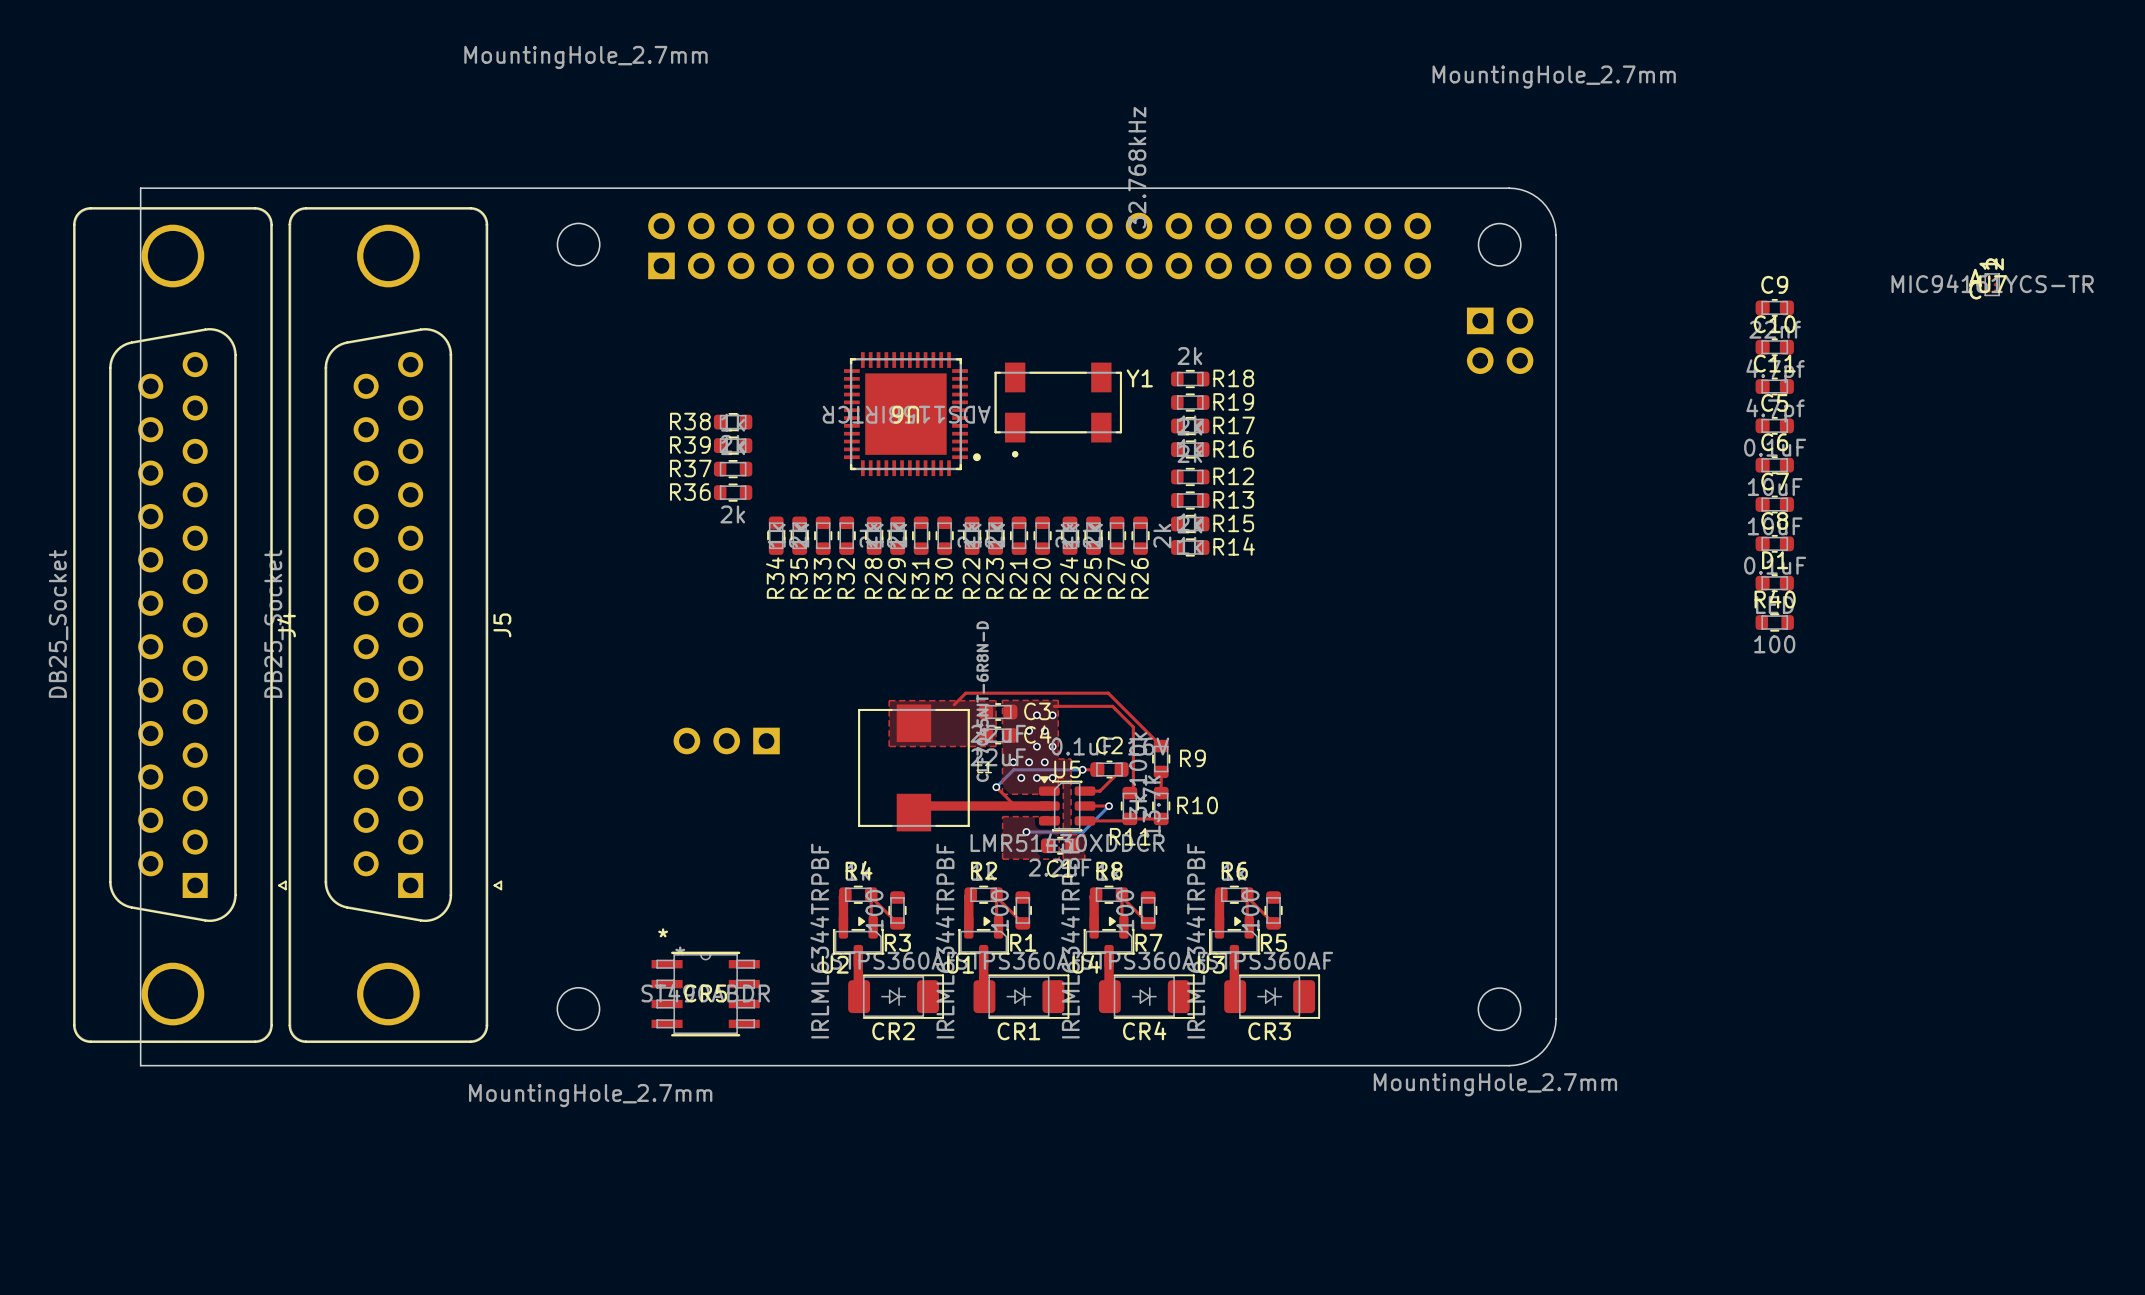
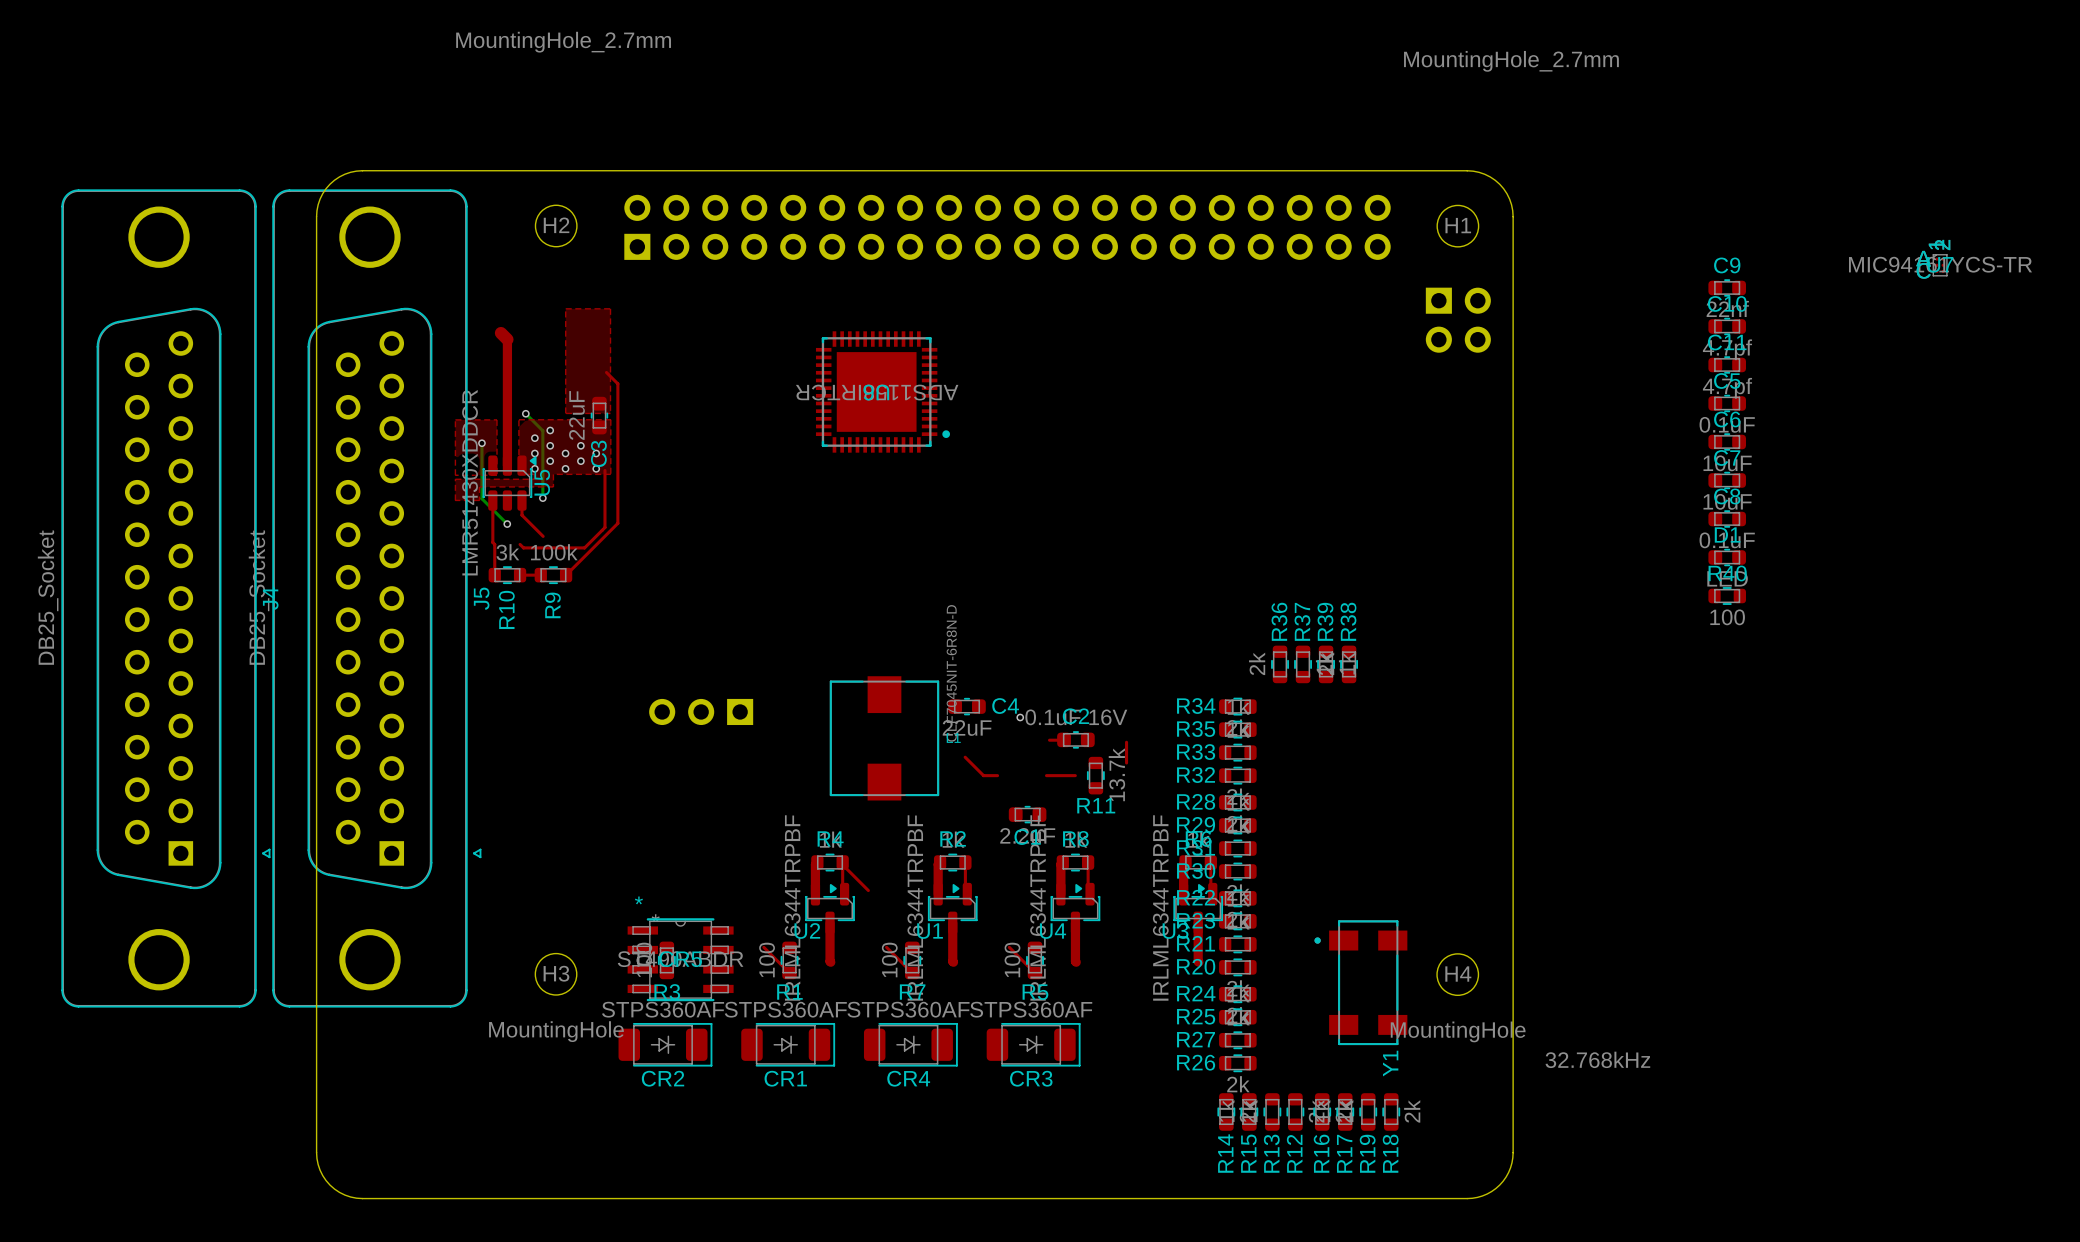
board edge: (1509, 188) (140, 188) (140, 1065) (1509, 1065) (1527, 1062) (1542, 1051) (1552, 1036) (1556, 1018) -> (1467, 170) (362, 170) (344, 174) (334, 180) (326, 188) (320, 199) (316, 216) (316, 1158) (322, 1175) (330, 1185) (344, 1195) (362, 1198) (1472, 1198) (1487, 1194) (1495, 1188) (1506, 1177) (1511, 1162) (1513, 983)
H2 name: none -> H2 (556, 225)
H1 name: none -> H1 (1458, 225)
top zone outline: none -> (565, 308) (565, 413) (610, 413) (610, 308) (565, 308)
top track: none -> (500, 333) (507, 339) (507, 465)
R18 rotation: 0° (1190, 379) -> 90° clockwise (1391, 1111)
R18 position: (1190, 379) -> (1391, 1111)
top track: none -> (606, 372) (617, 383) (617, 523) (566, 575)
R19 rotation: 0° (1190, 402) -> 90° clockwise (1368, 1111)
R19 position: (1190, 402) -> (1368, 1111)
Y1 rotation: 0° (1058, 409) -> 90° clockwise (1360, 982)
Y1 position: (1058, 409) -> (1360, 982)
R38 rotation: 0° (733, 422) -> 90° clockwise (1349, 664)
R38 position: (733, 422) -> (1349, 664)
R17 rotation: 0° (1190, 426) -> 90° clockwise (1345, 1111)
R17 position: (1190, 426) -> (1345, 1111)
bottom track: none -> (525, 413) (542, 430) (542, 498)
via: none -> (525, 413)
top zone outline: none -> (455, 419) (455, 475) (496, 475) (496, 419) (455, 419)
top zone outline: none -> (518, 419) (518, 474) (534, 474) (534, 479) (455, 479) (455, 500) (479, 500) (479, 486) (553, 486) (553, 474) (610, 474) (610, 419) (518, 419)
R39 rotation: 0° (733, 445) -> 90° clockwise (1326, 664)
R39 position: (733, 445) -> (1326, 664)
R16 rotation: 0° (1190, 449) -> 90° clockwise (1322, 1111)
R16 position: (1190, 449) -> (1322, 1111)
via: none -> (550, 430)
via: none -> (534, 438)
bottom track: none -> (481, 443) (481, 498) (507, 524)
via: none -> (481, 443)
via: none -> (550, 445)
via: none -> (580, 445)
R37 rotation: 0° (733, 469) -> 90° clockwise (1303, 664)
R37 position: (733, 469) -> (1303, 664)
via: none -> (534, 453)
via: none -> (565, 453)
via: none -> (596, 453)
R12 rotation: 0° (1190, 476) -> 90° clockwise (1295, 1111)
R12 position: (1190, 476) -> (1295, 1111)
via: none -> (550, 461)
via: none -> (580, 461)
via: none -> (534, 468)
via: none -> (565, 468)
via: none -> (596, 468)
R36 rotation: 0° (733, 492) -> 90° clockwise (1280, 664)
R36 position: (733, 492) -> (1280, 664)
top track: none -> (604, 470) (604, 527) (584, 547) (523, 547) (520, 544)
R13 rotation: 0° (1190, 500) -> 90° clockwise (1272, 1111)
R13 position: (1190, 500) -> (1272, 1111)
via: none -> (542, 498)
R15 rotation: 0° (1190, 523) -> 90° clockwise (1249, 1111)
R15 position: (1190, 523) -> (1249, 1111)
top track: none -> (492, 500) (494, 575)
top track: none -> (521, 500) (521, 515) (543, 536)
R34 rotation: 0° (776, 535) -> 90° clockwise (1237, 706)
R34 position: (776, 535) -> (1237, 706)
R35 rotation: 0° (799, 535) -> 90° clockwise (1237, 729)
R35 position: (799, 535) -> (1237, 729)
R33 rotation: 0° (823, 535) -> 90° clockwise (1237, 752)
R33 position: (823, 535) -> (1237, 752)
R32 rotation: 0° (846, 535) -> 90° clockwise (1237, 775)
R32 position: (846, 535) -> (1237, 775)
R28 rotation: 0° (874, 535) -> 90° clockwise (1237, 802)
R28 position: (874, 535) -> (1237, 802)
R29 rotation: 0° (897, 535) -> 90° clockwise (1237, 825)
R29 position: (897, 535) -> (1237, 825)
R31 rotation: 0° (921, 535) -> 90° clockwise (1237, 848)
R31 position: (921, 535) -> (1237, 848)
R30 rotation: 0° (944, 535) -> 90° clockwise (1237, 871)
R30 position: (944, 535) -> (1237, 871)
R22 rotation: 0° (972, 535) -> 90° clockwise (1237, 898)
R22 position: (972, 535) -> (1237, 898)
R23 rotation: 0° (995, 535) -> 90° clockwise (1237, 921)
R23 position: (995, 535) -> (1237, 921)
R21 rotation: 0° (1019, 535) -> 90° clockwise (1237, 944)
R21 position: (1019, 535) -> (1237, 944)
R20 rotation: 0° (1042, 535) -> 90° clockwise (1237, 967)
R20 position: (1042, 535) -> (1237, 967)
R24 rotation: 0° (1070, 535) -> 90° clockwise (1237, 994)
R24 position: (1070, 535) -> (1237, 994)
R25 rotation: 0° (1093, 535) -> 90° clockwise (1237, 1017)
R25 position: (1093, 535) -> (1237, 1017)
R27 rotation: 0° (1117, 535) -> 90° clockwise (1237, 1040)
R27 position: (1117, 535) -> (1237, 1040)
R26 rotation: 0° (1140, 535) -> 90° clockwise (1237, 1063)
R26 position: (1140, 535) -> (1237, 1063)
R14 rotation: 0° (1190, 547) -> 90° clockwise (1226, 1111)
R14 position: (1190, 547) -> (1226, 1111)
via: none -> (507, 524)
top track: none -> (520, 575) (540, 575)
top zone outline: (889, 700) (996, 700) (996, 746) (889, 746) (889, 700) -> none
top zone outline: (1002, 700) (1058, 700) (1058, 759) (1071, 759) (1071, 834) (1084, 834) (1084, 859) (1063, 859) (1063, 778) (1058, 778) (1058, 794) (1002, 794) (1002, 700) -> none
top track: (954, 704) (965, 693) (1108, 693) (1161, 746) -> none
top track: (1054, 706) (1112, 706) (1133, 727) (1133, 789) (1129, 793) -> none
C3 rotation: 0° (998, 711) -> 90° clockwise (599, 415)
C3 position: (998, 711) -> (599, 415)
via: (1036, 715) -> none
via: (1052, 715) -> none
via: (1029, 730) -> none
via: (1044, 730) -> none
via: (1036, 746) -> none
R9 rotation: 0° (1161, 759) -> 90° clockwise (553, 575)
R9 position: (1161, 759) -> (553, 575)
via: (1013, 762) -> none
via: (1029, 762) -> none
via: (1044, 762) -> none
bottom track: (1082, 769) (1013, 769) (996, 787) -> none
via: (1082, 769) -> none
top track: (1121, 769) (1100, 791) (1085, 791) -> none
via: (1021, 777) -> none
via: (1036, 777) -> none
via: (1052, 777) -> none
via: (996, 787) -> none
U5 rotation: 0° (1067, 803) -> 90° clockwise (509, 483)
U5 position: (1067, 803) -> (509, 483)
top track: (1049, 806) (920, 806) (913, 812) -> none
bottom track: (1109, 806) (1083, 832) (1026, 832) -> none
via: (1109, 806) -> none
R10 rotation: 0° (1161, 806) -> 90° clockwise (507, 575)
R10 position: (1161, 806) -> (507, 575)
top zone outline: (1002, 816) (1059, 816) (1059, 859) (1002, 859) (1002, 816) -> none
top track: (1161, 818) (1085, 820) -> none
via: (1026, 832) -> none
top track: (996, 897) (1022, 923) -> (763, 947) (789, 973)
top track: (1121, 897) (1148, 923) -> (886, 947) (912, 973)
top track: (1247, 897) (1273, 923) -> (1009, 947) (1035, 973)
R3 position: (897, 910) -> (666, 960)
R1 position: (1022, 910) -> (789, 960)
R7 position: (1148, 910) -> (912, 960)
R5 position: (1273, 910) -> (1035, 960)
CR2 position: (896, 996) -> (665, 1044)
CR1 position: (1021, 996) -> (788, 1044)
CR4 position: (1146, 996) -> (910, 1044)
CR3 position: (1272, 996) -> (1033, 1044)
H3 name: none -> H3 (556, 973)
H4 name: none -> H4 (1458, 974)
H4 value: MountingHole_2.7mm (1495, 1084) -> MountingHole (1458, 1031)
H3 value: MountingHole_2.7mm (590, 1095) -> MountingHole (556, 1031)

